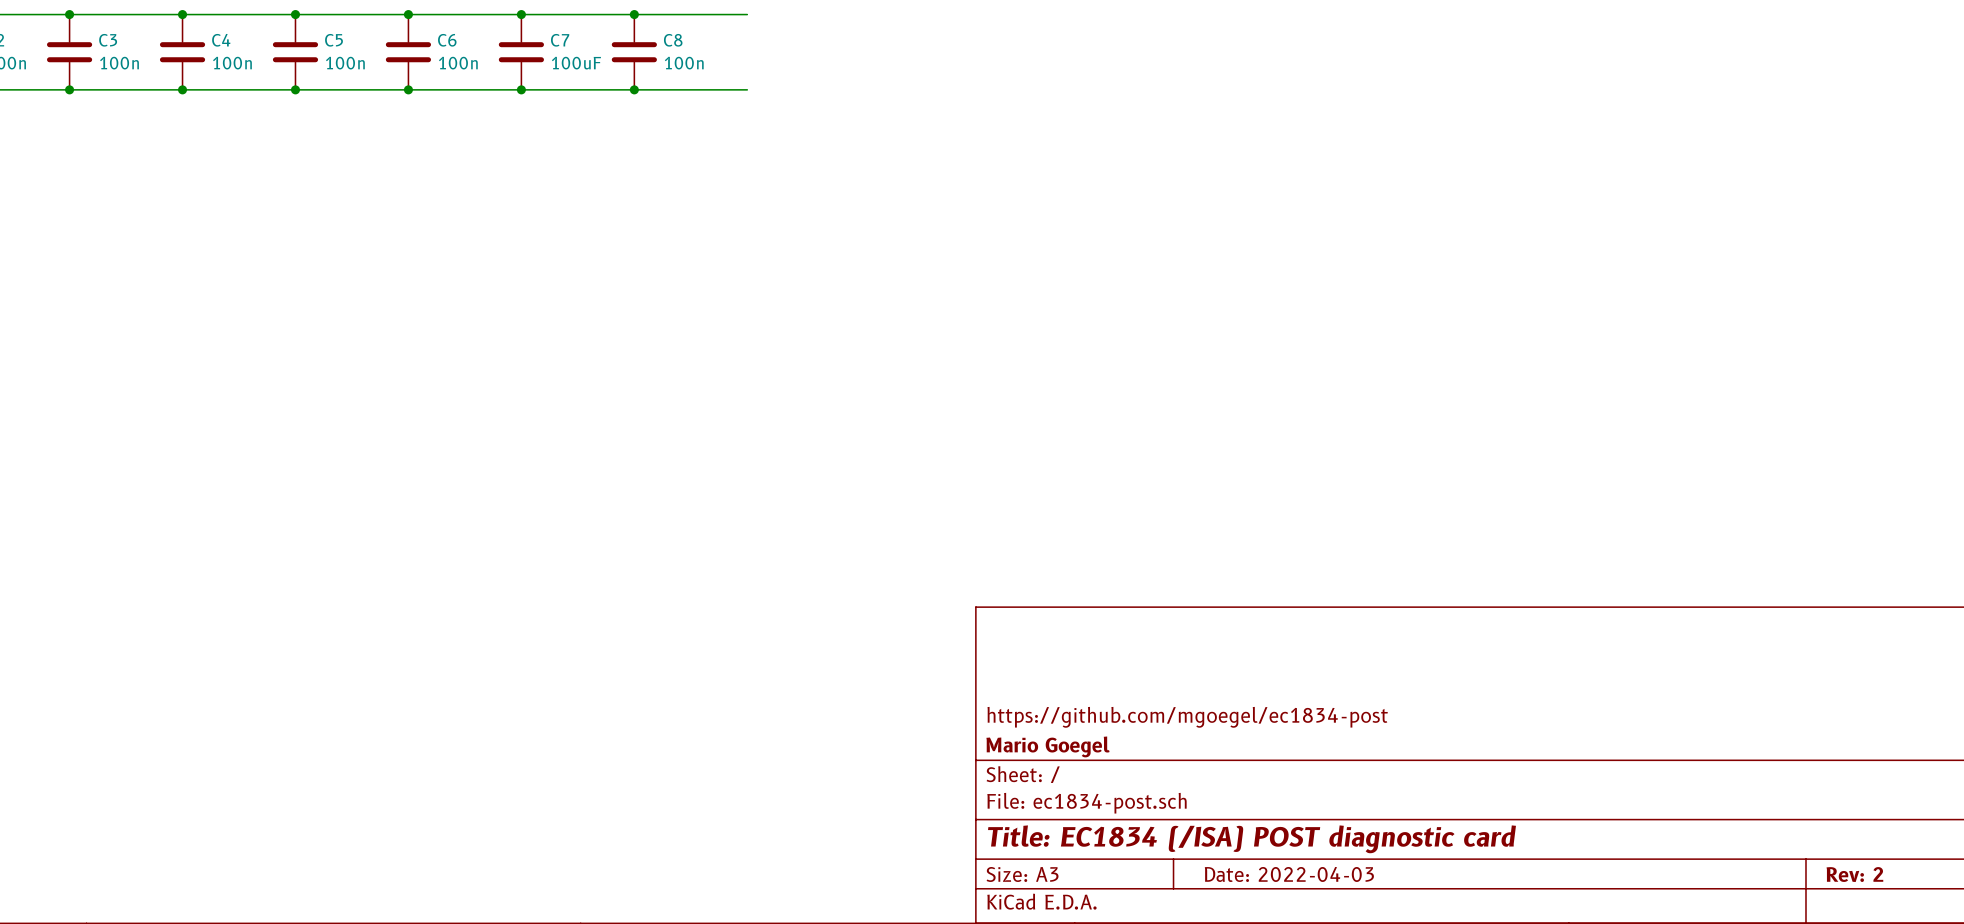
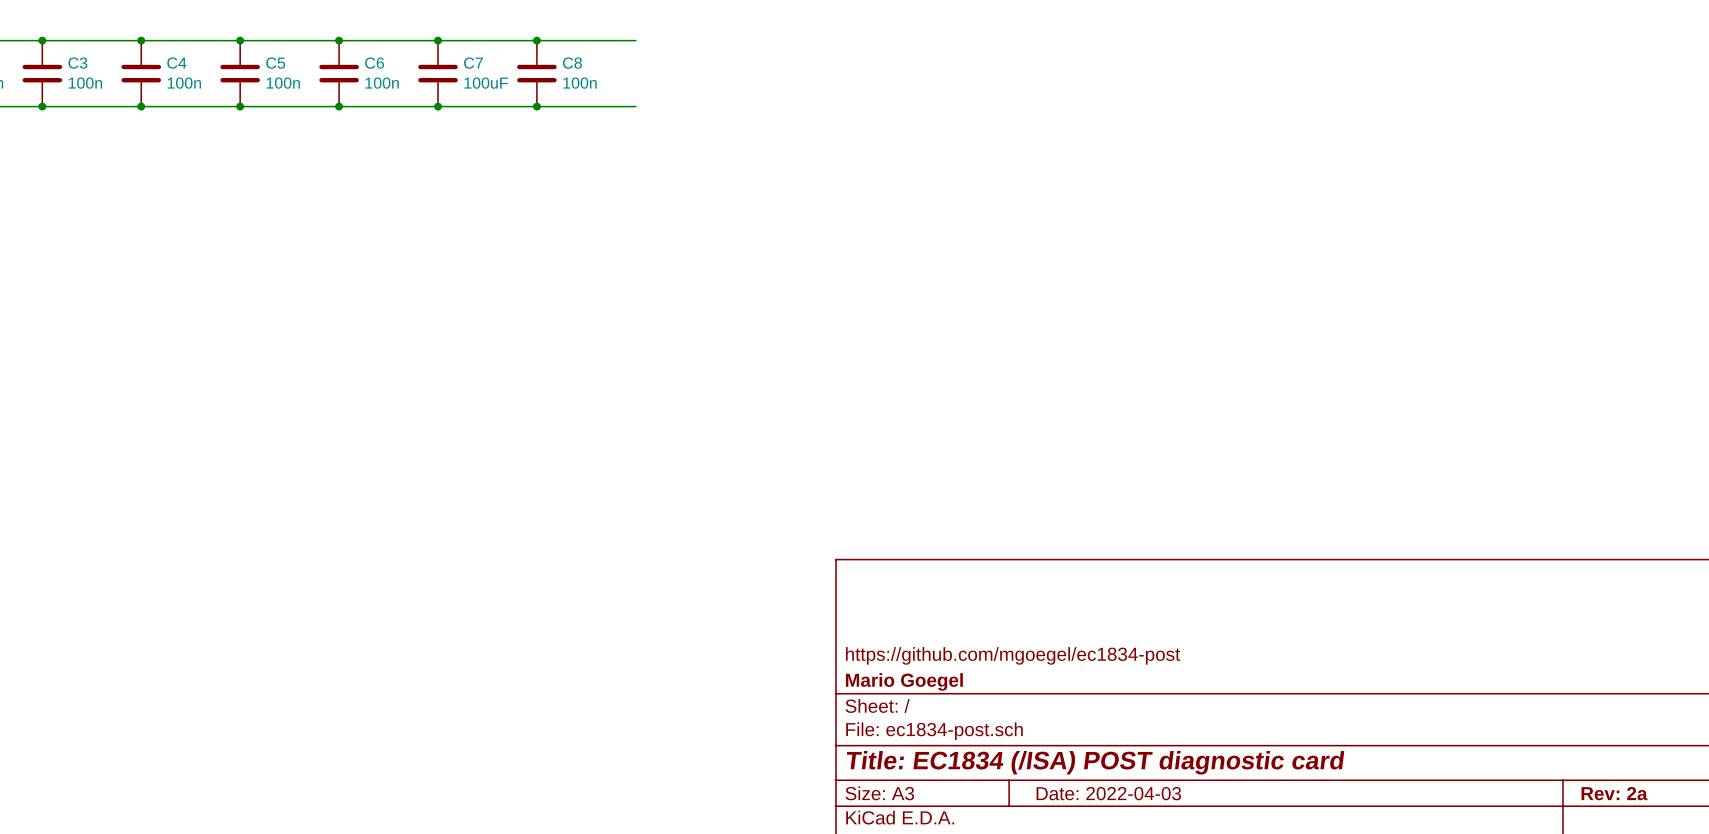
title block: Rev: 2 (1854, 874) -> Rev: 2a (1614, 793)

